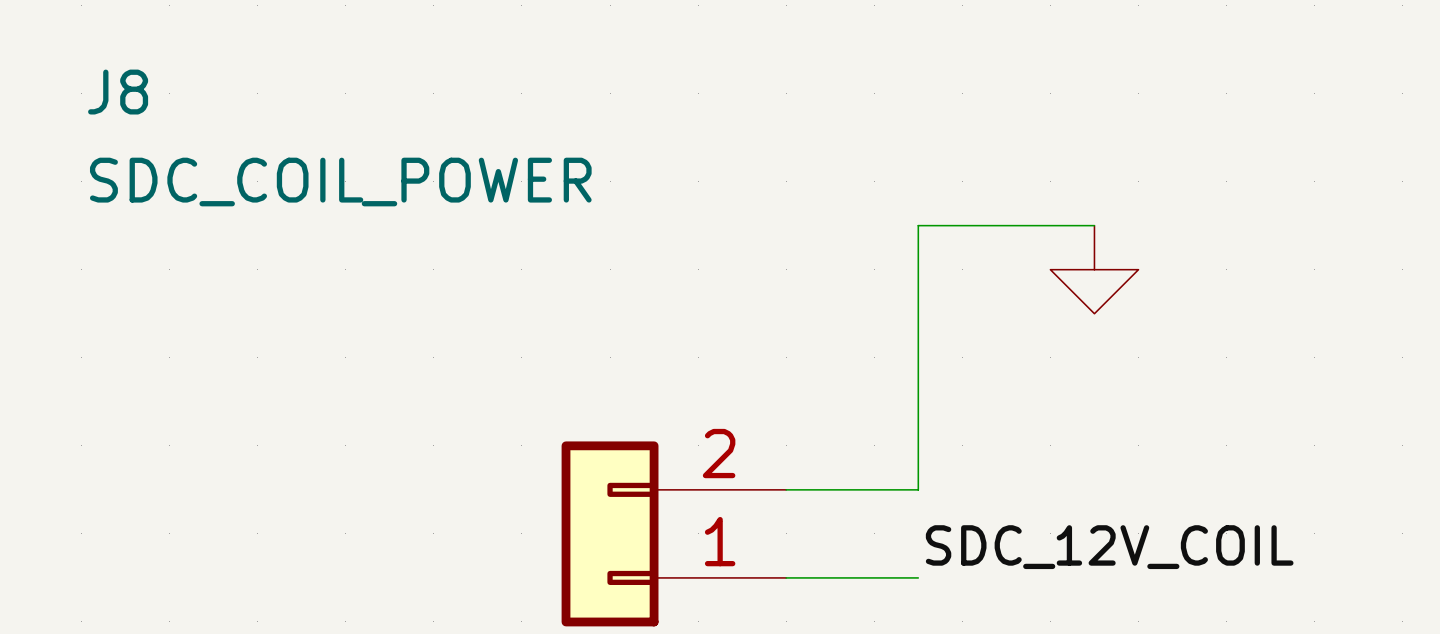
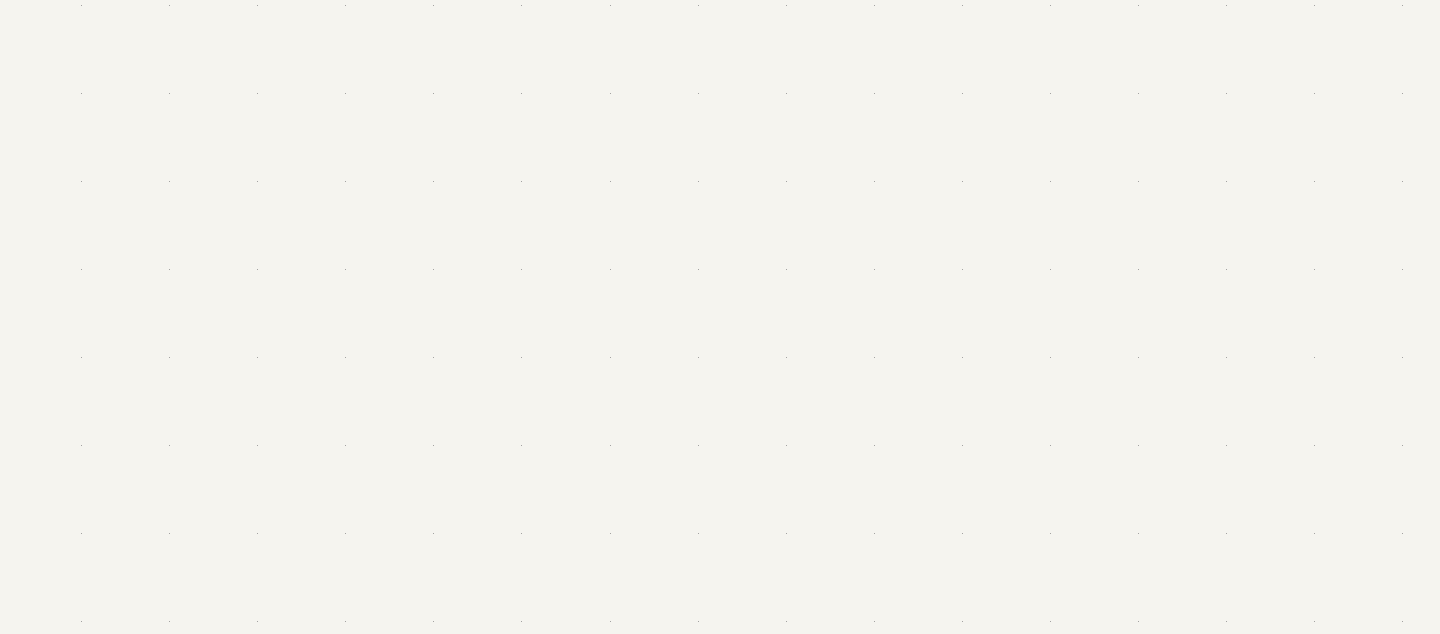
wire: (1094, 225) (918, 225) (918, 489) (786, 489) -> none
power symbol: (1094, 269) -> none
J8: SDC_COIL_POWER (673, 533) -> none
label: SDC_12V_COIL (1109, 547) -> none
wire: (786, 577) (918, 577) -> none

